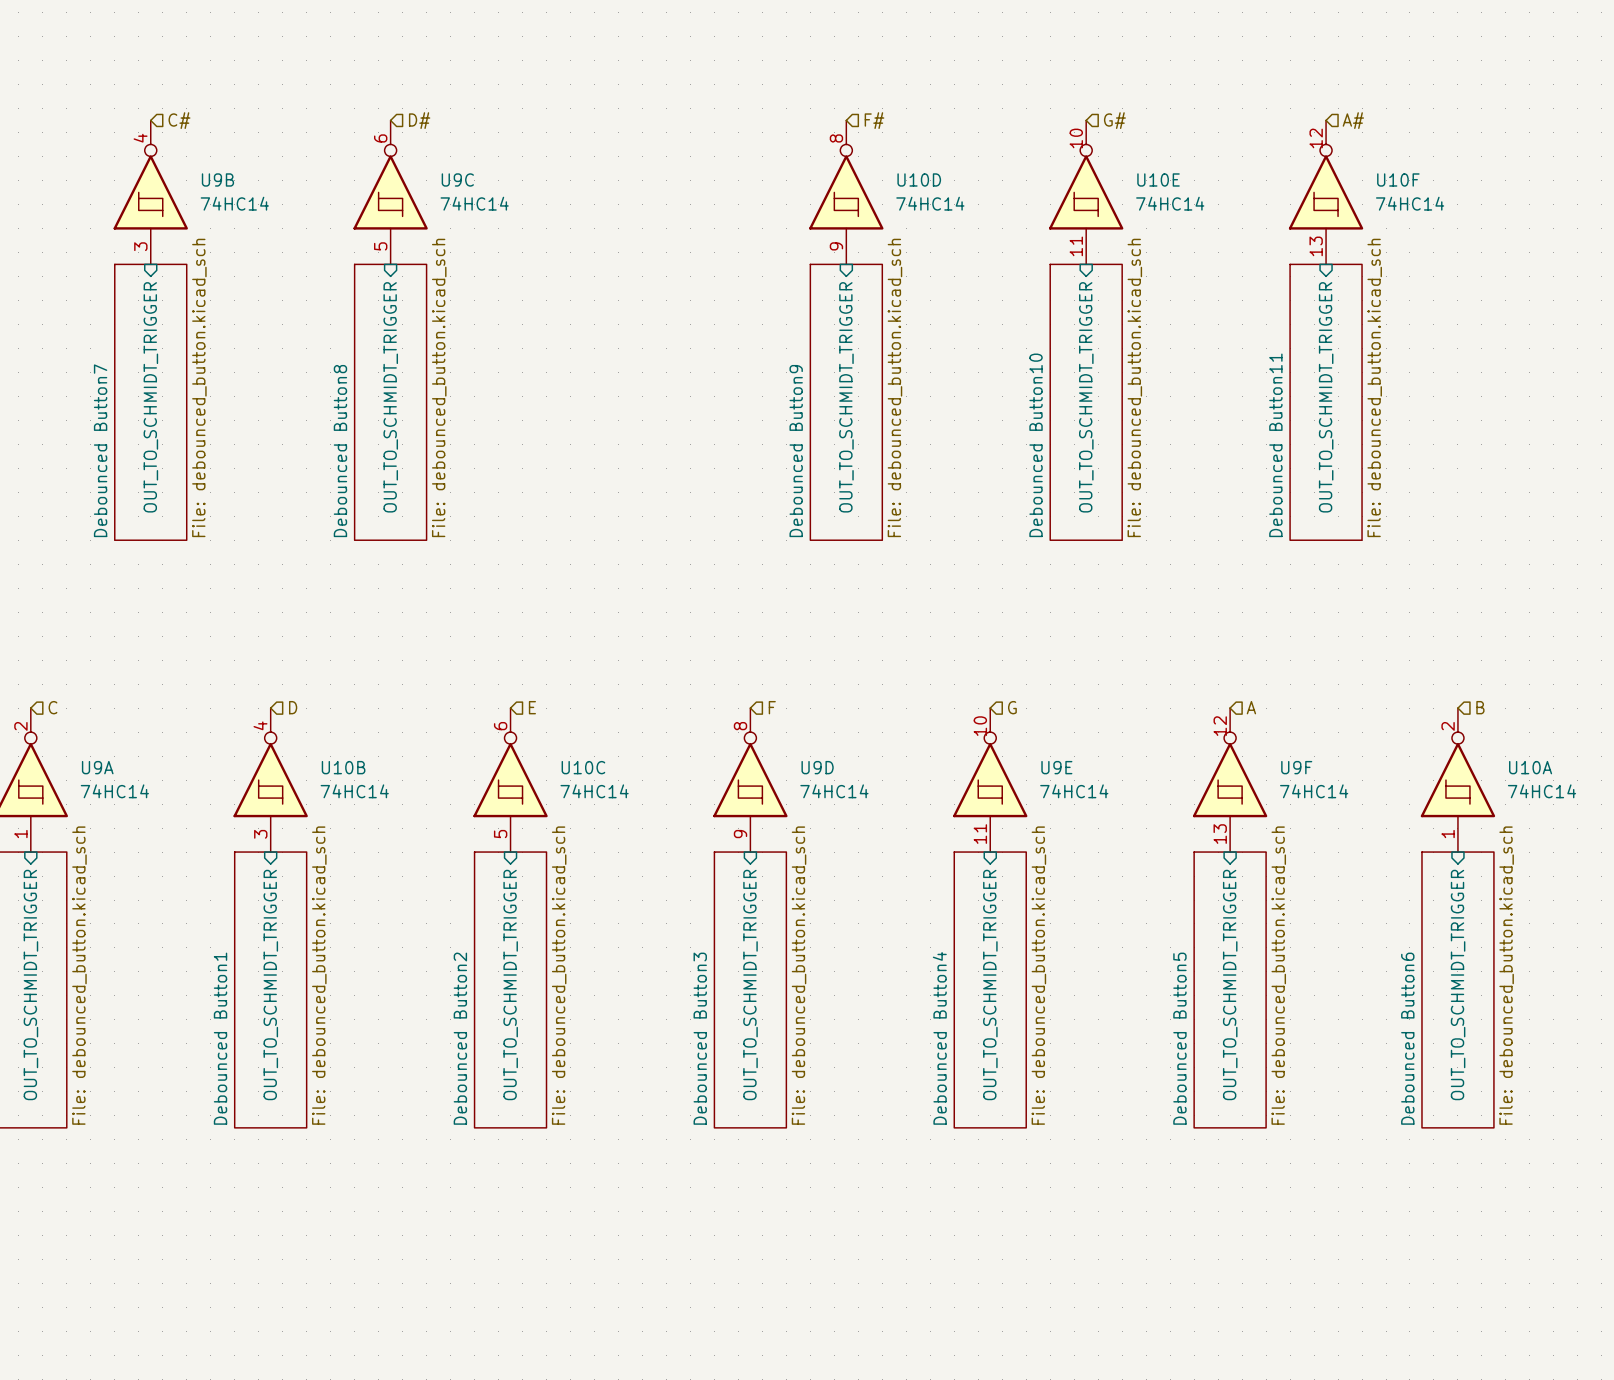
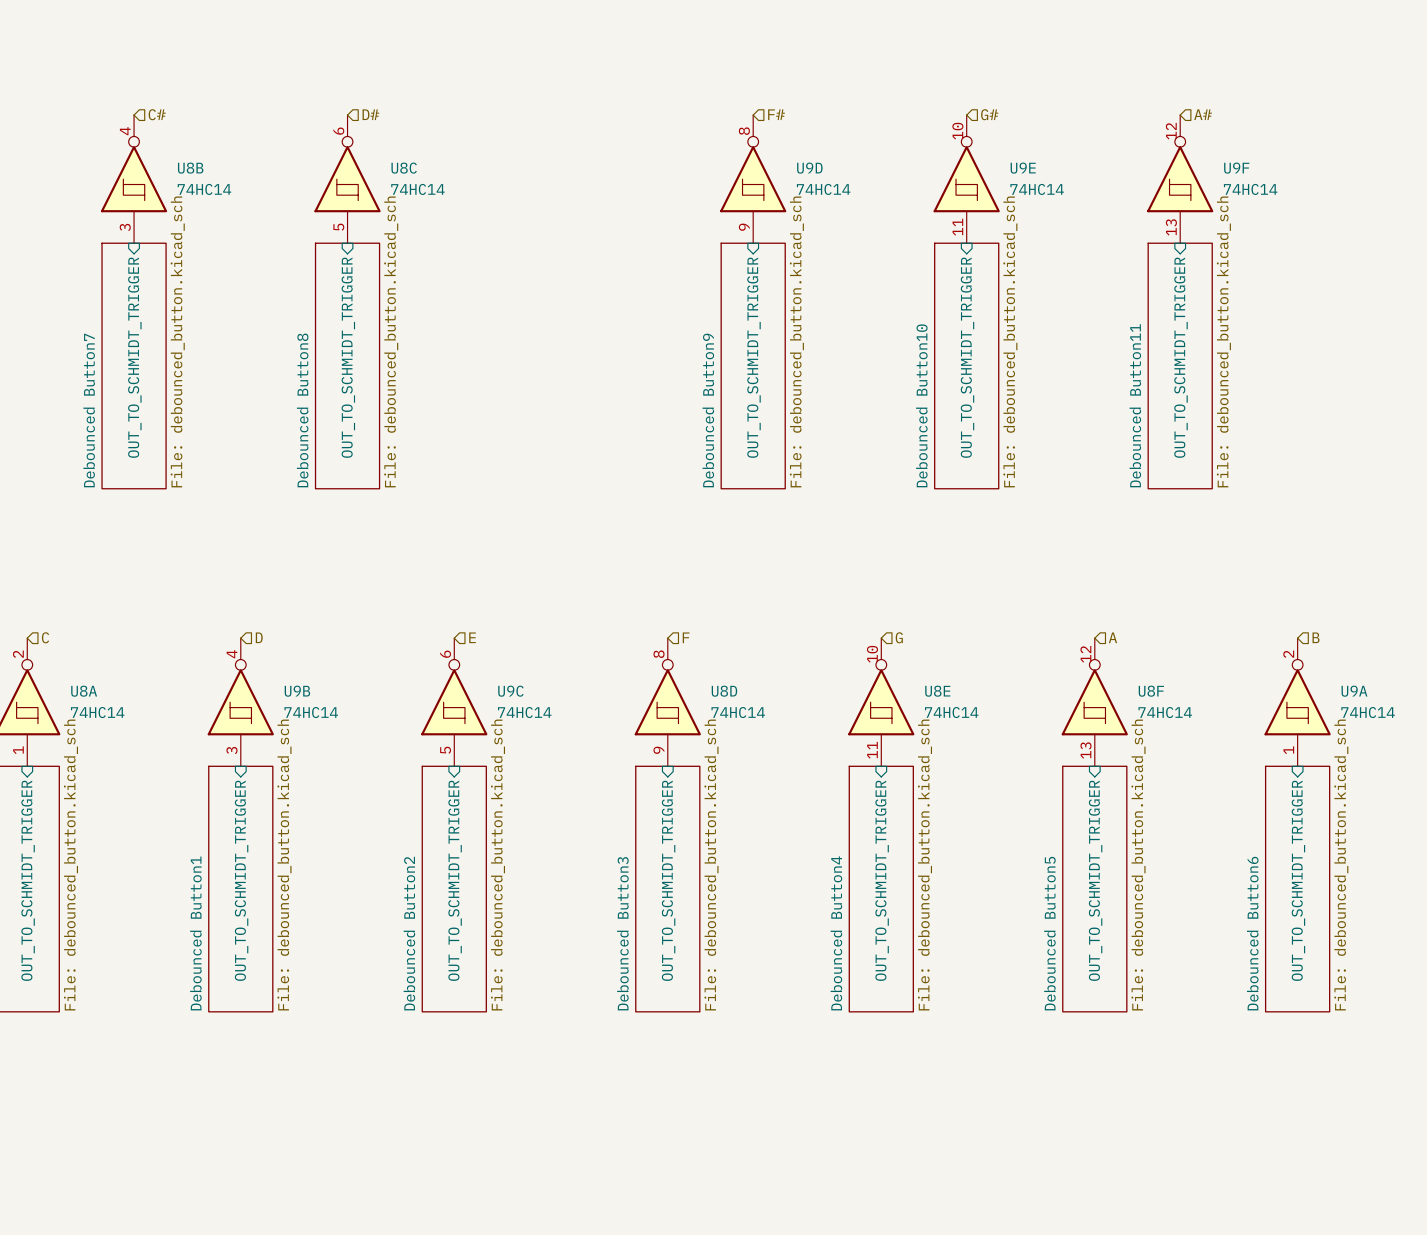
U9B name: U9B (217, 179) -> U8B (190, 168)
U9C name: U9C (457, 179) -> U8C (404, 168)
U10D name: U10D (919, 179) -> U9D (809, 168)
U10E name: U10E (1158, 179) -> U9E (1023, 168)
U10F name: U10F (1398, 179) -> U9F (1236, 168)
U9A name: U9A (97, 767) -> U8A (84, 691)
U10B name: U10B (343, 767) -> U9B (297, 691)
U10C name: U10C (583, 767) -> U9C (510, 691)
U9D name: U9D (817, 767) -> U8D (724, 691)
U9E name: U9E (1056, 767) -> U8E (937, 691)
U9F name: U9F (1296, 767) -> U8F (1151, 691)
U10A name: U10A (1530, 767) -> U9A (1354, 691)

